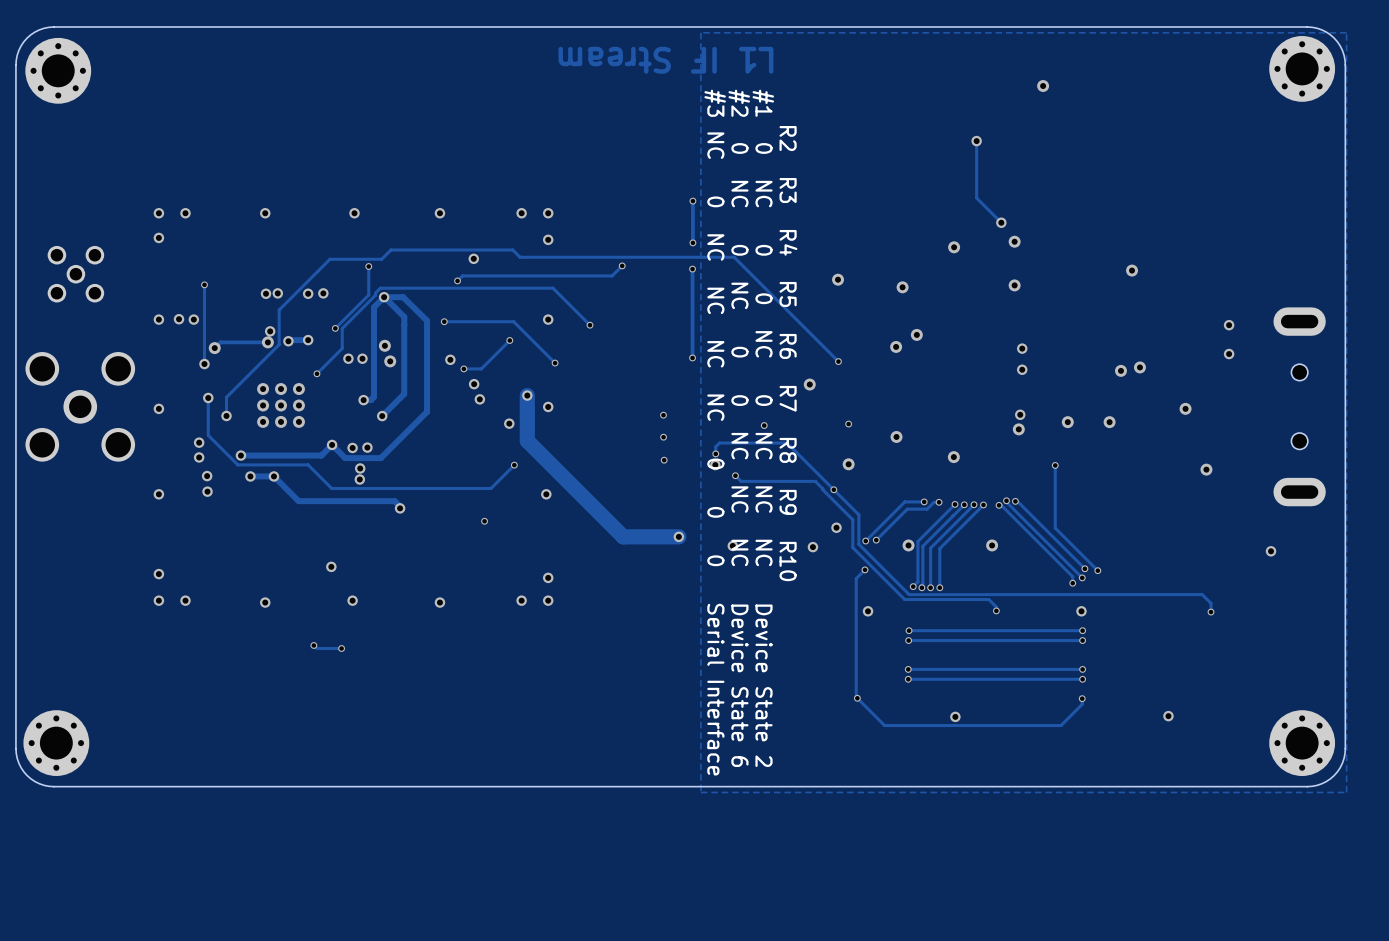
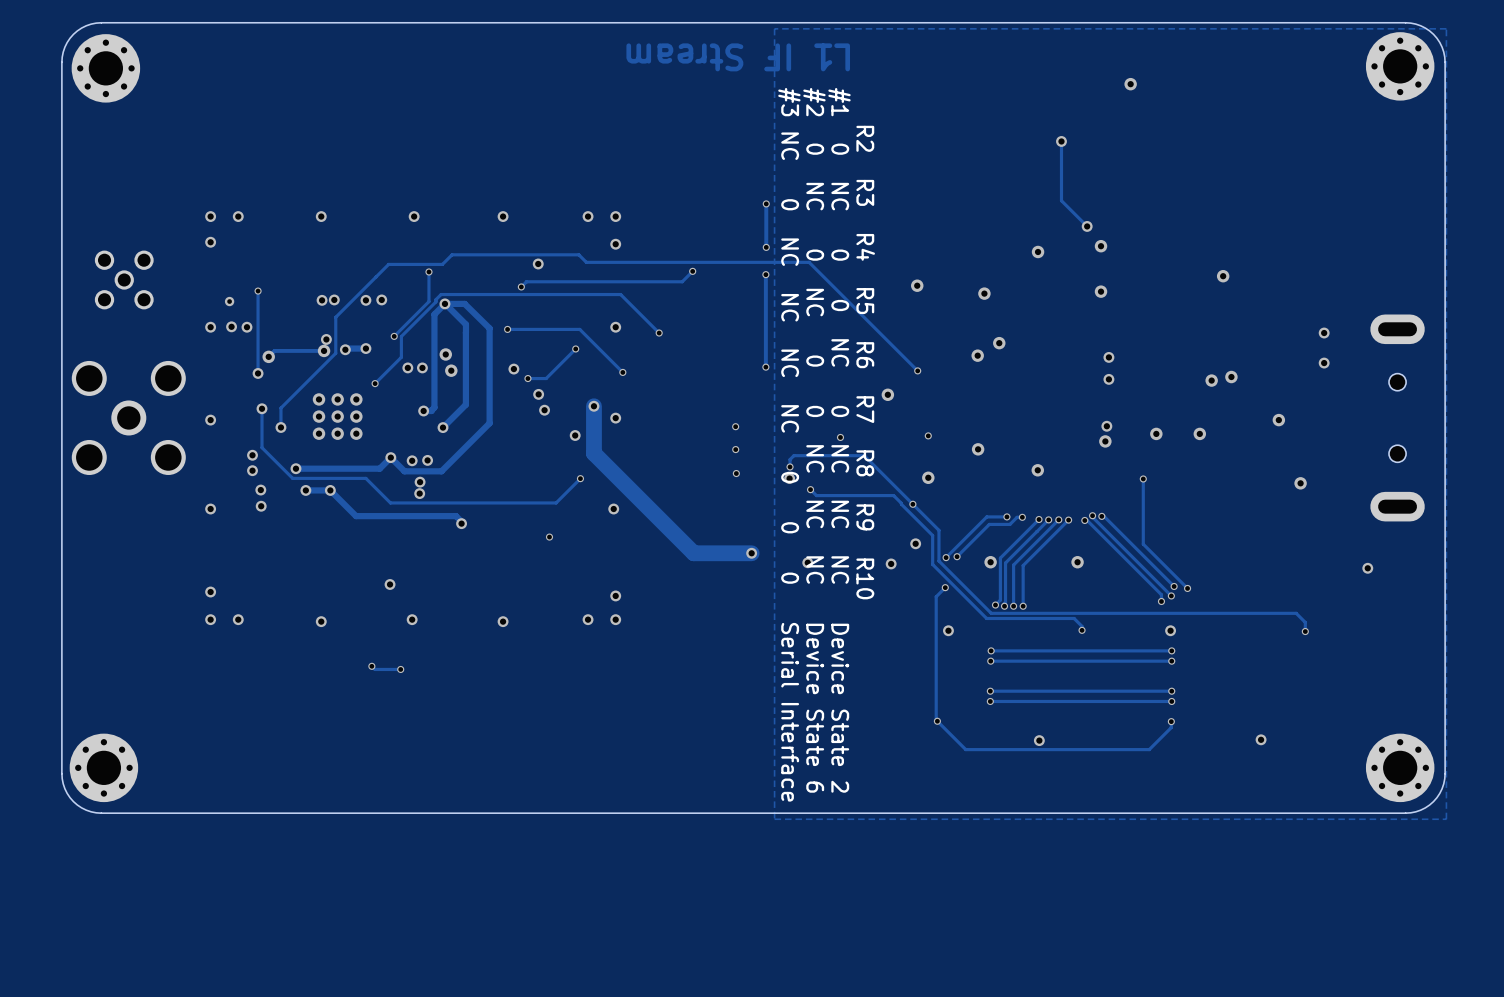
via: none -> (229, 301)

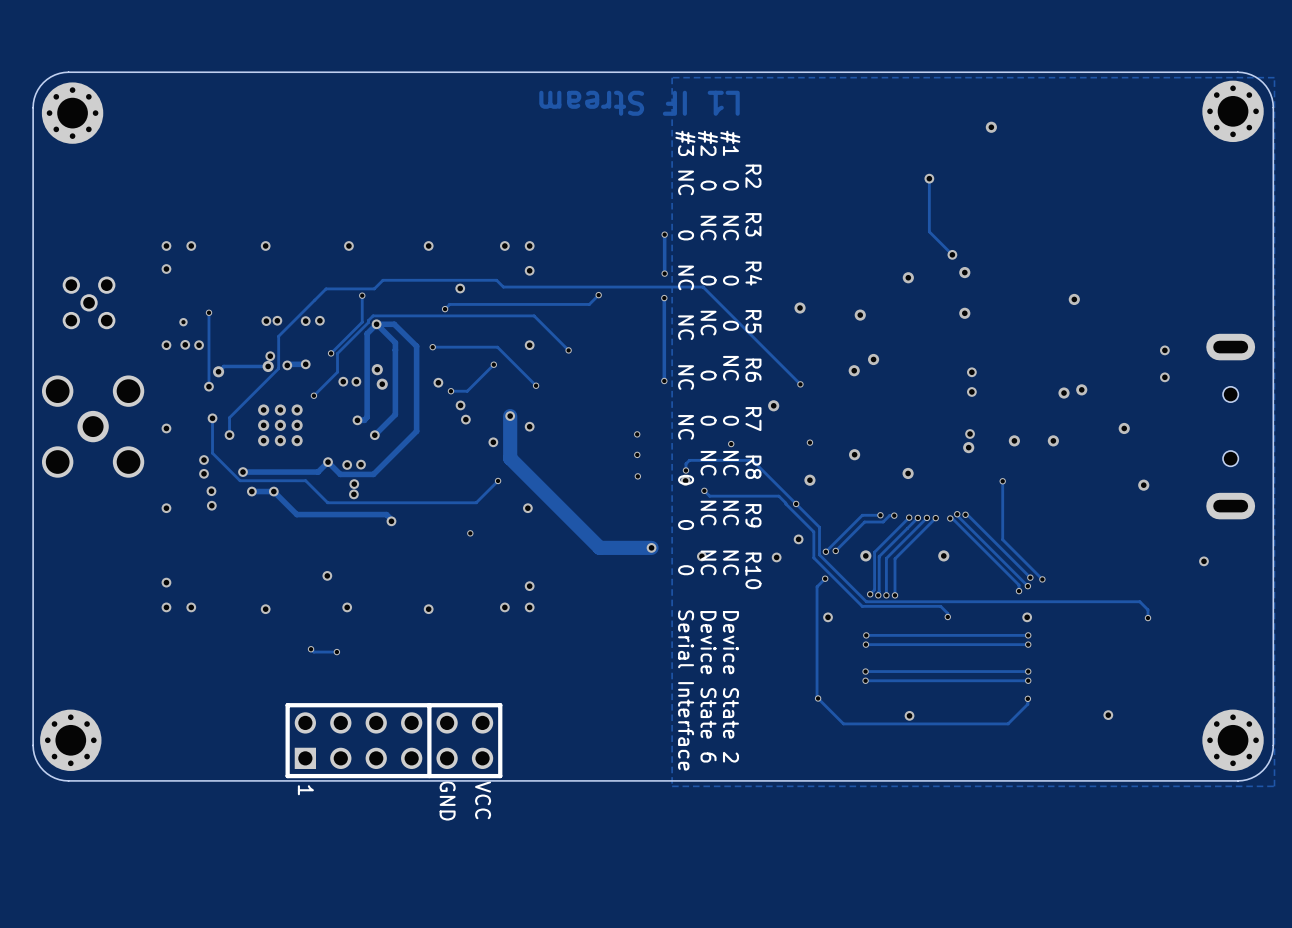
part: none -> (393, 740)

